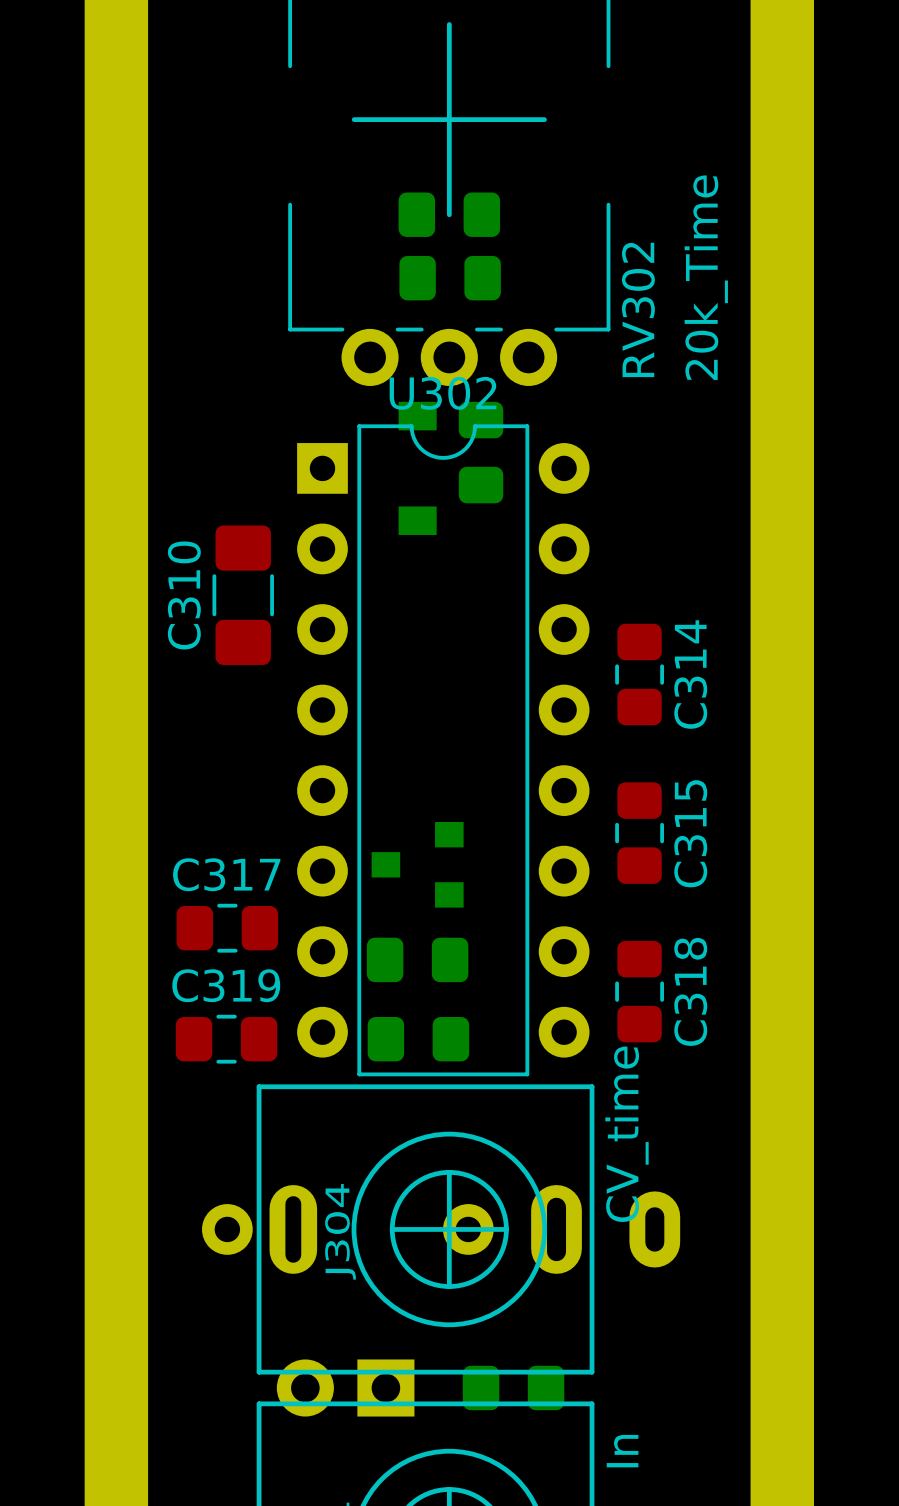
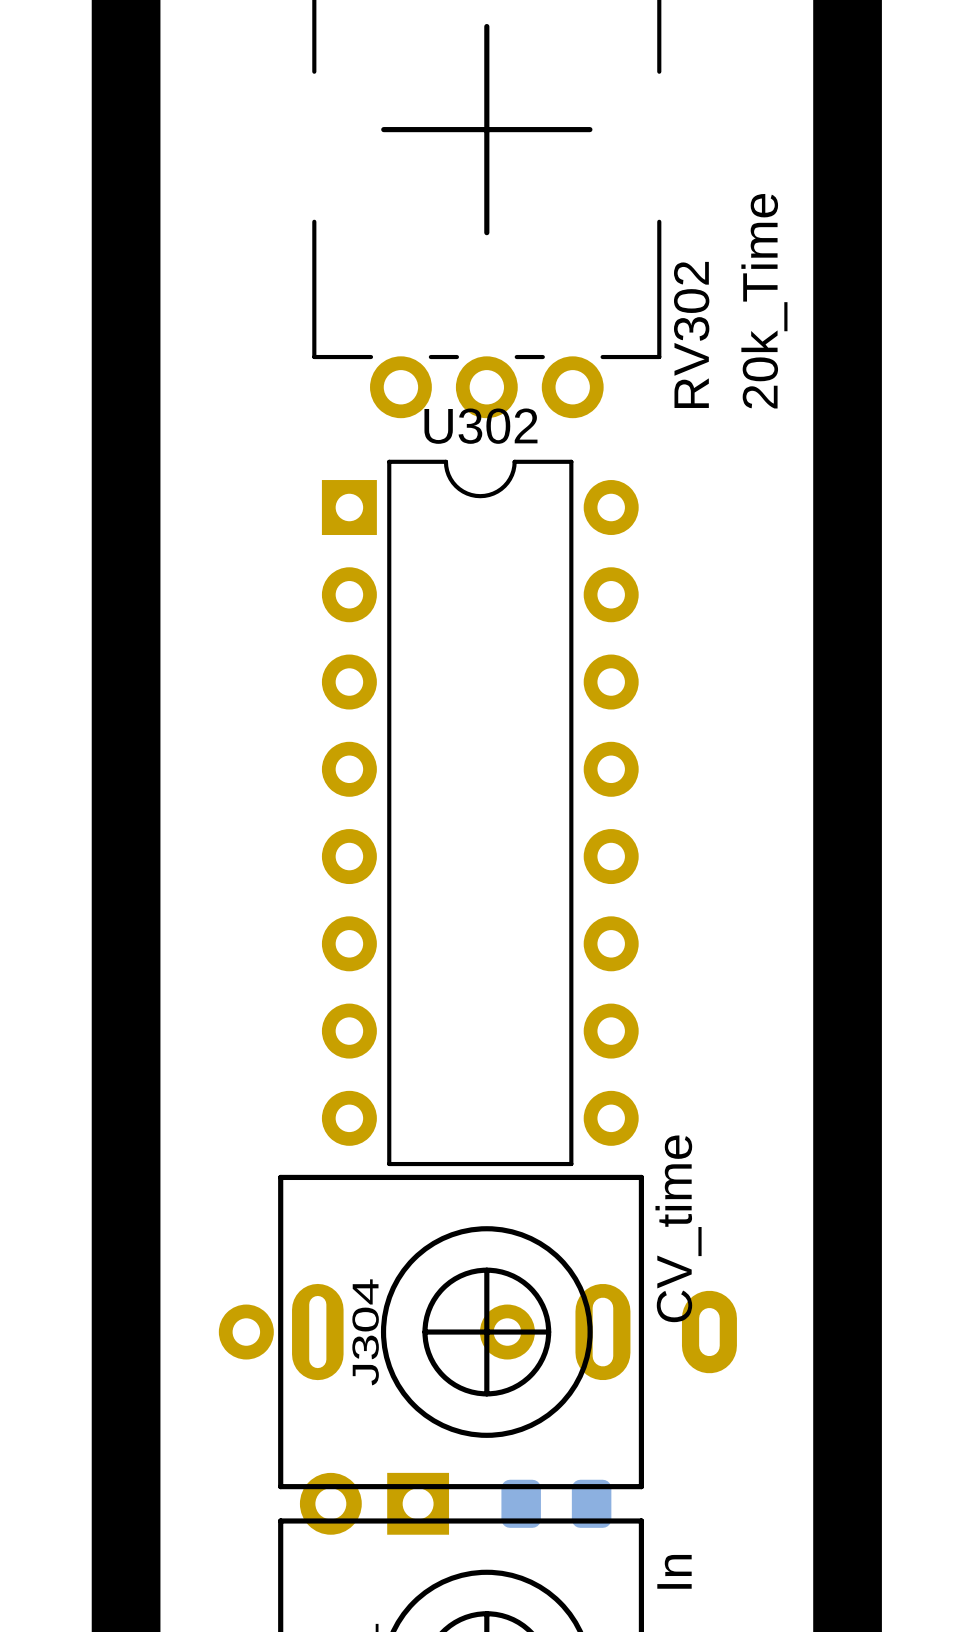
part: (449, 214) -> none
part: (450, 278) -> none
part: (481, 452) -> none
part: (417, 468) -> none
C310: (243, 595) -> none
C314: (639, 674) -> none
C315: (639, 833) -> none
part: (417, 864) -> none
C317: (227, 928) -> none
part: (417, 959) -> none
C318: (639, 991) -> none
C319: (226, 1039) -> none
part: (418, 1039) -> none

